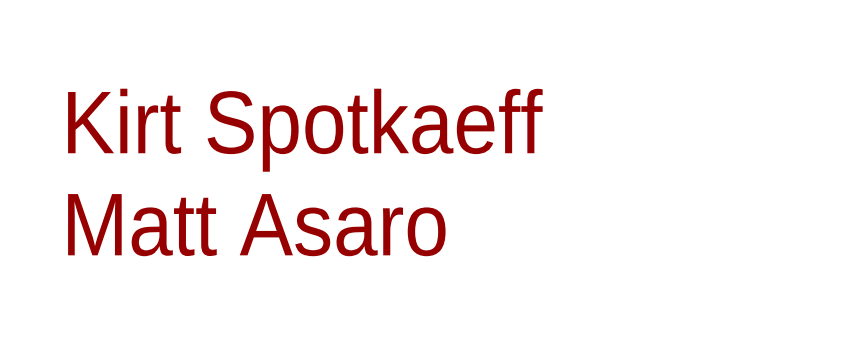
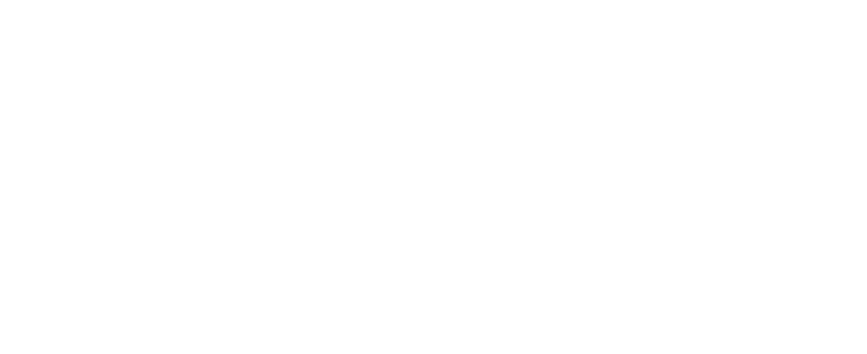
text: Kirt Spotkaeff (305, 130) -> none
text: Matt Asaro (256, 225) -> none

